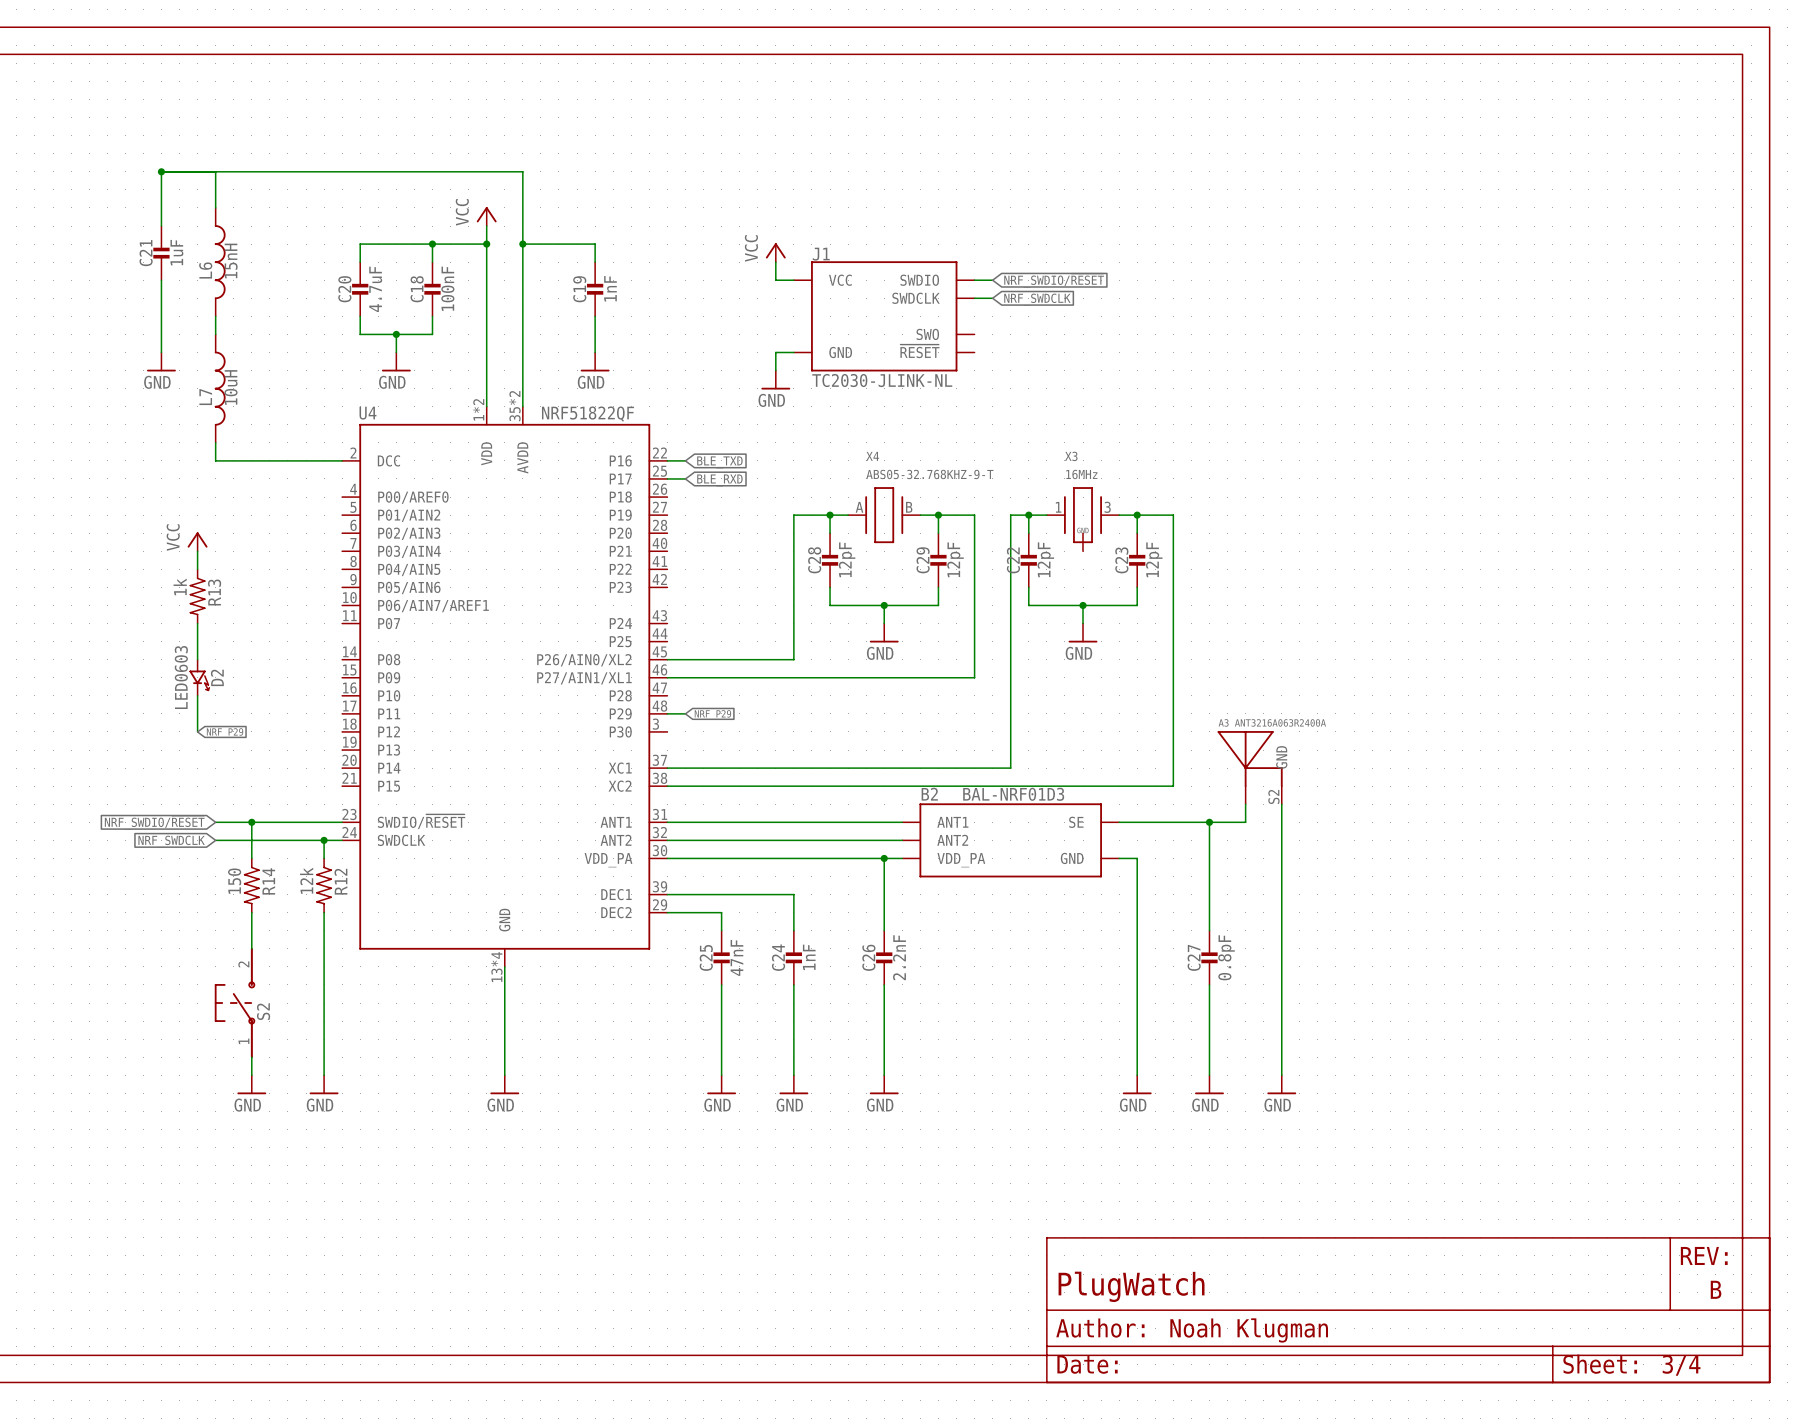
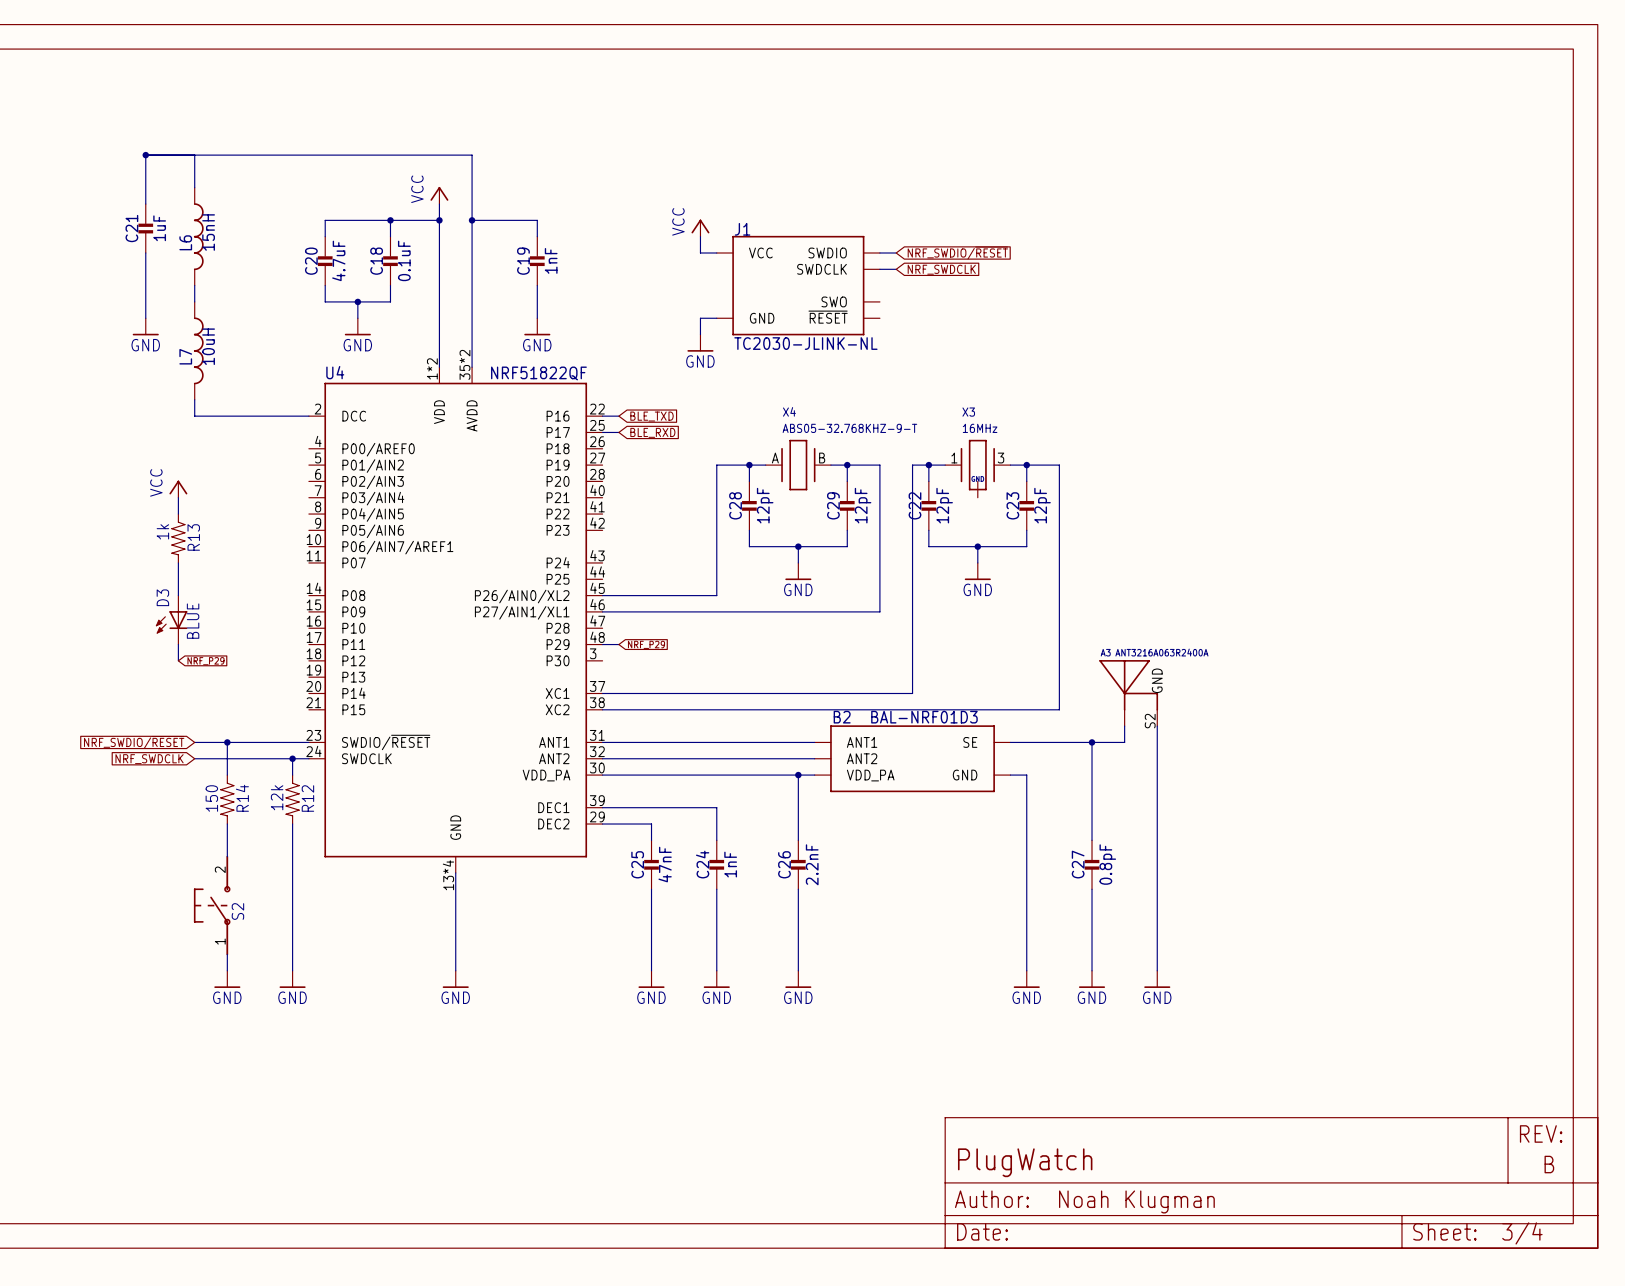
C18 value: 100nF (447, 288) -> 0.1uF (404, 260)
D2: LED0603 (199, 677) -> none
D3: none -> BLUE (171, 620)

